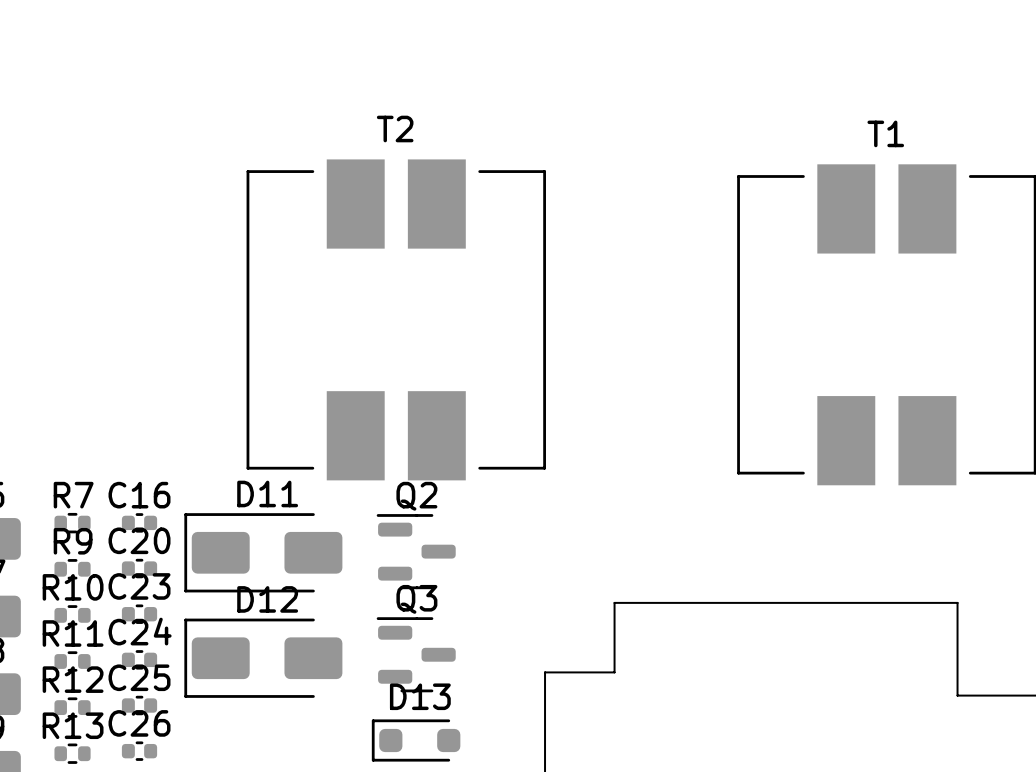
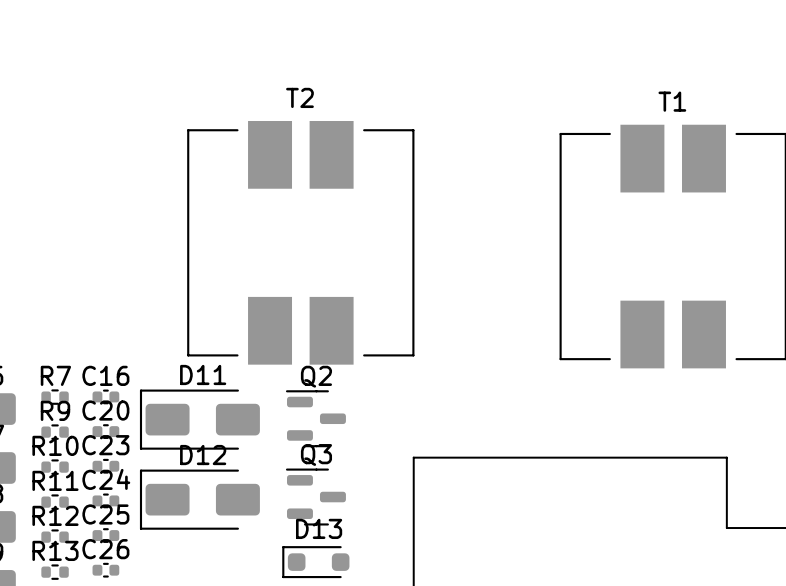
board edge: (614, 602) (614, 672) (545, 672) -> (466, 457) (413, 457) (413, 510)

